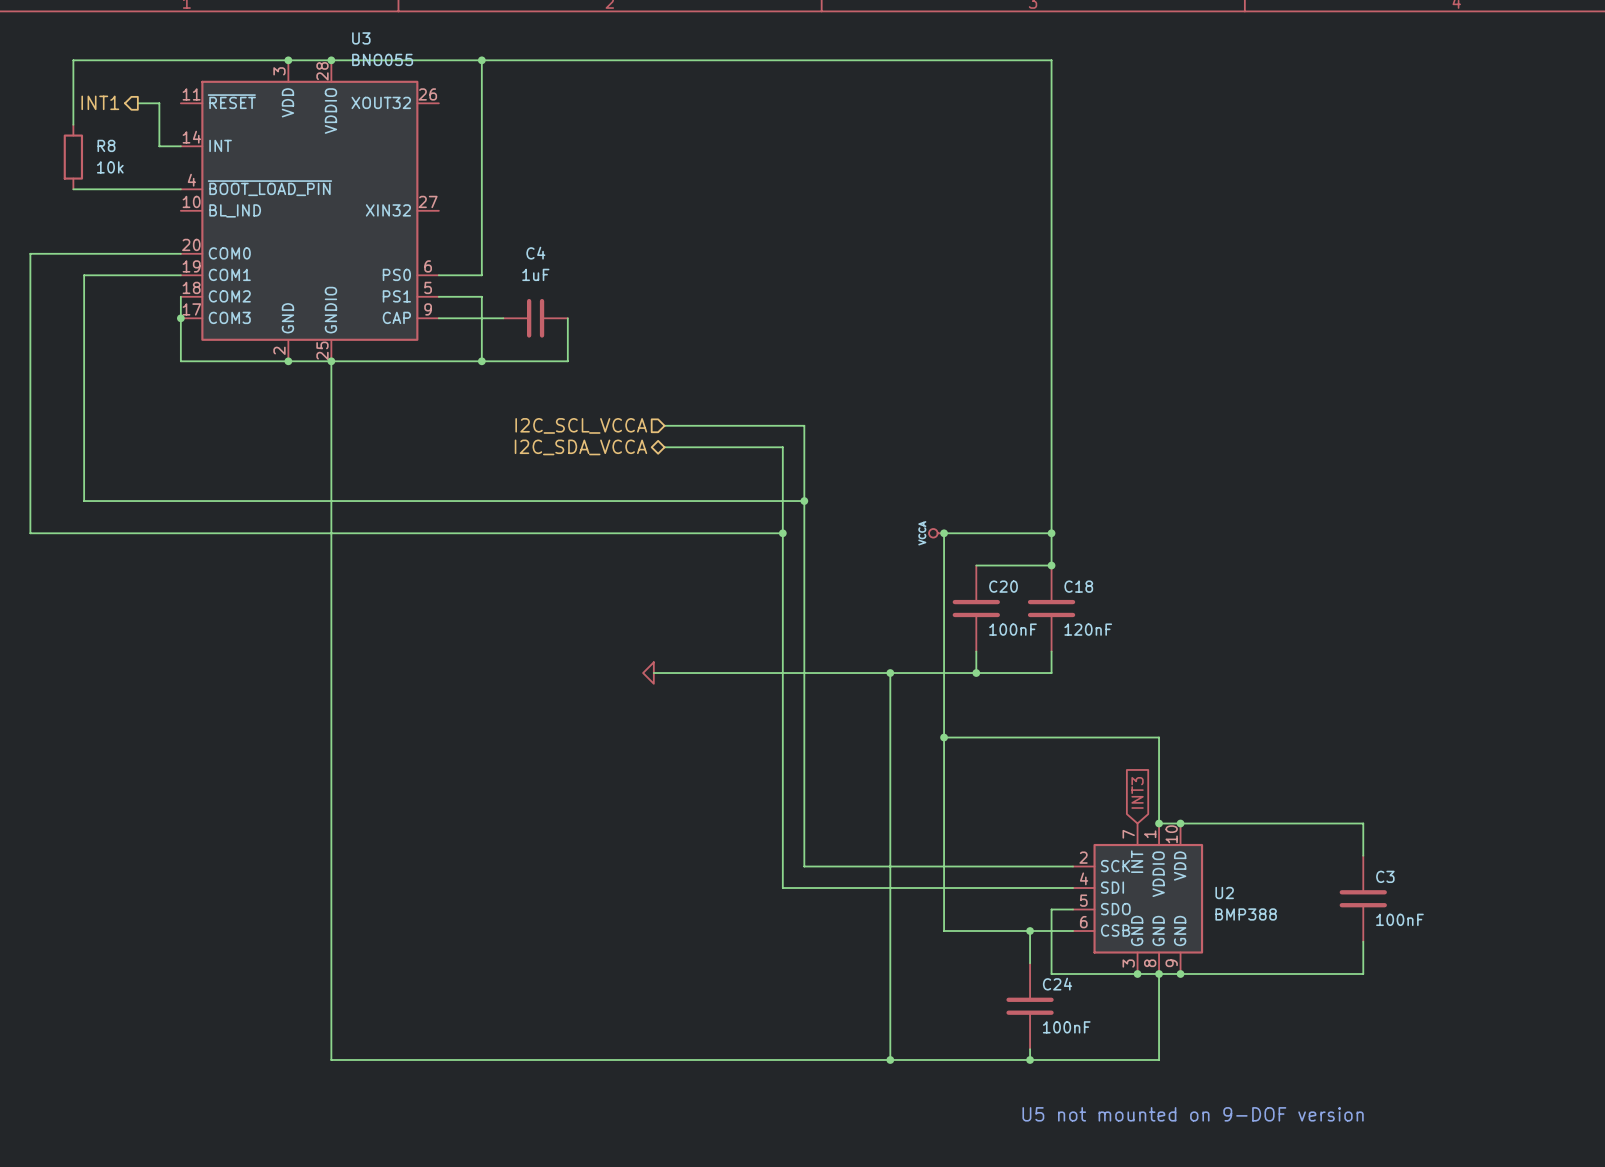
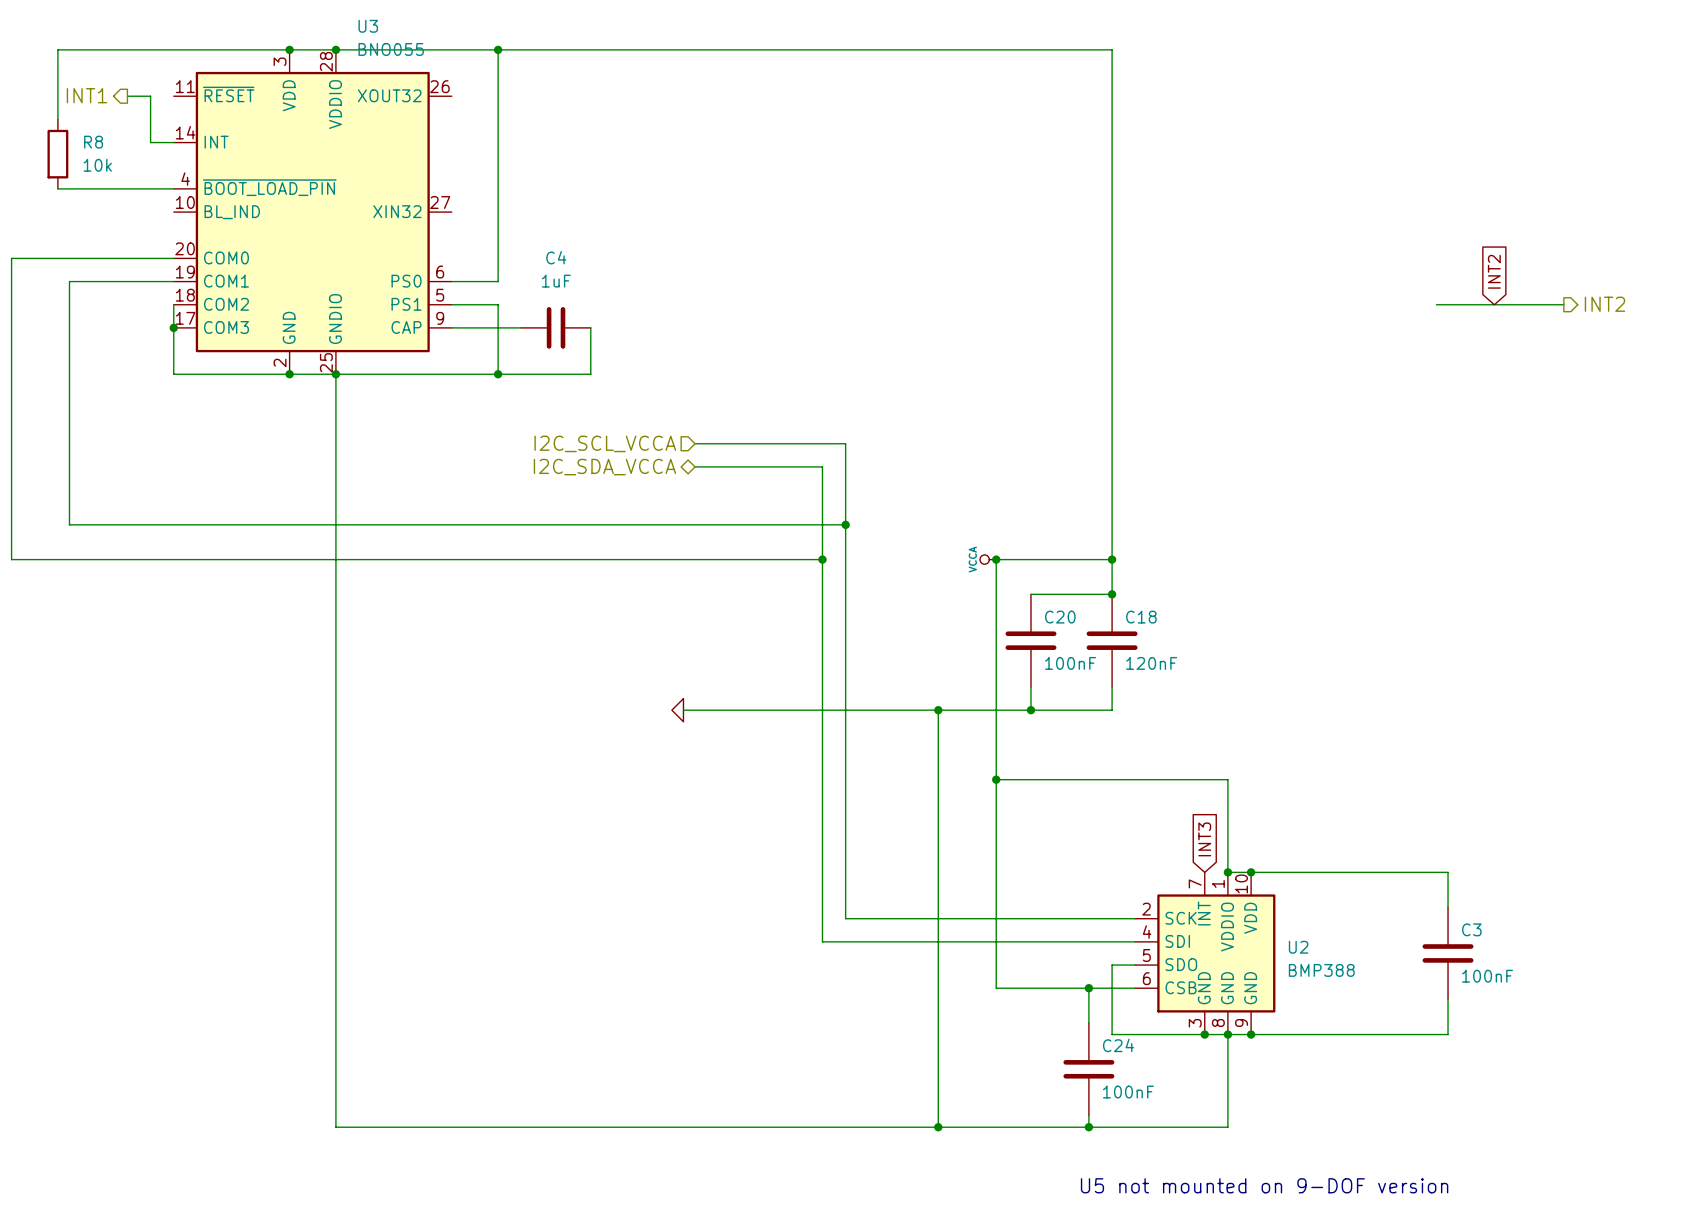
global label: none -> INT2 (1494, 271)
wire: none -> (1436, 304) (1563, 304)
hierarchical label: none -> INT2 (1604, 304)

